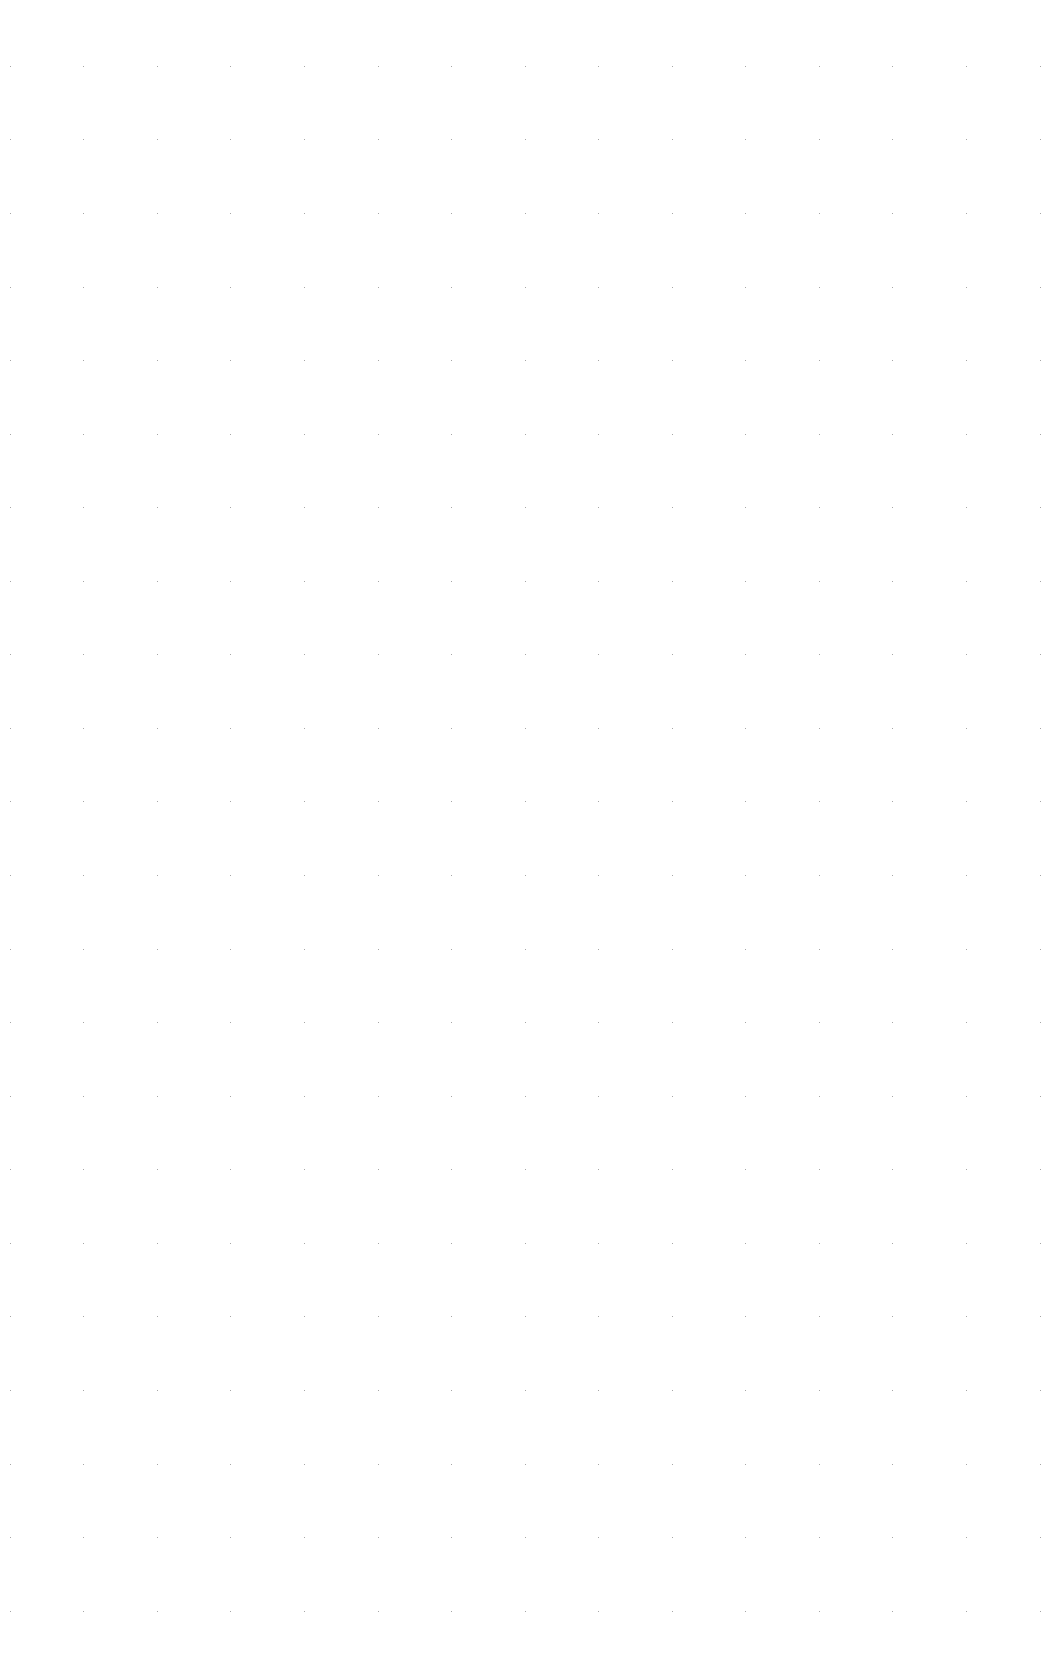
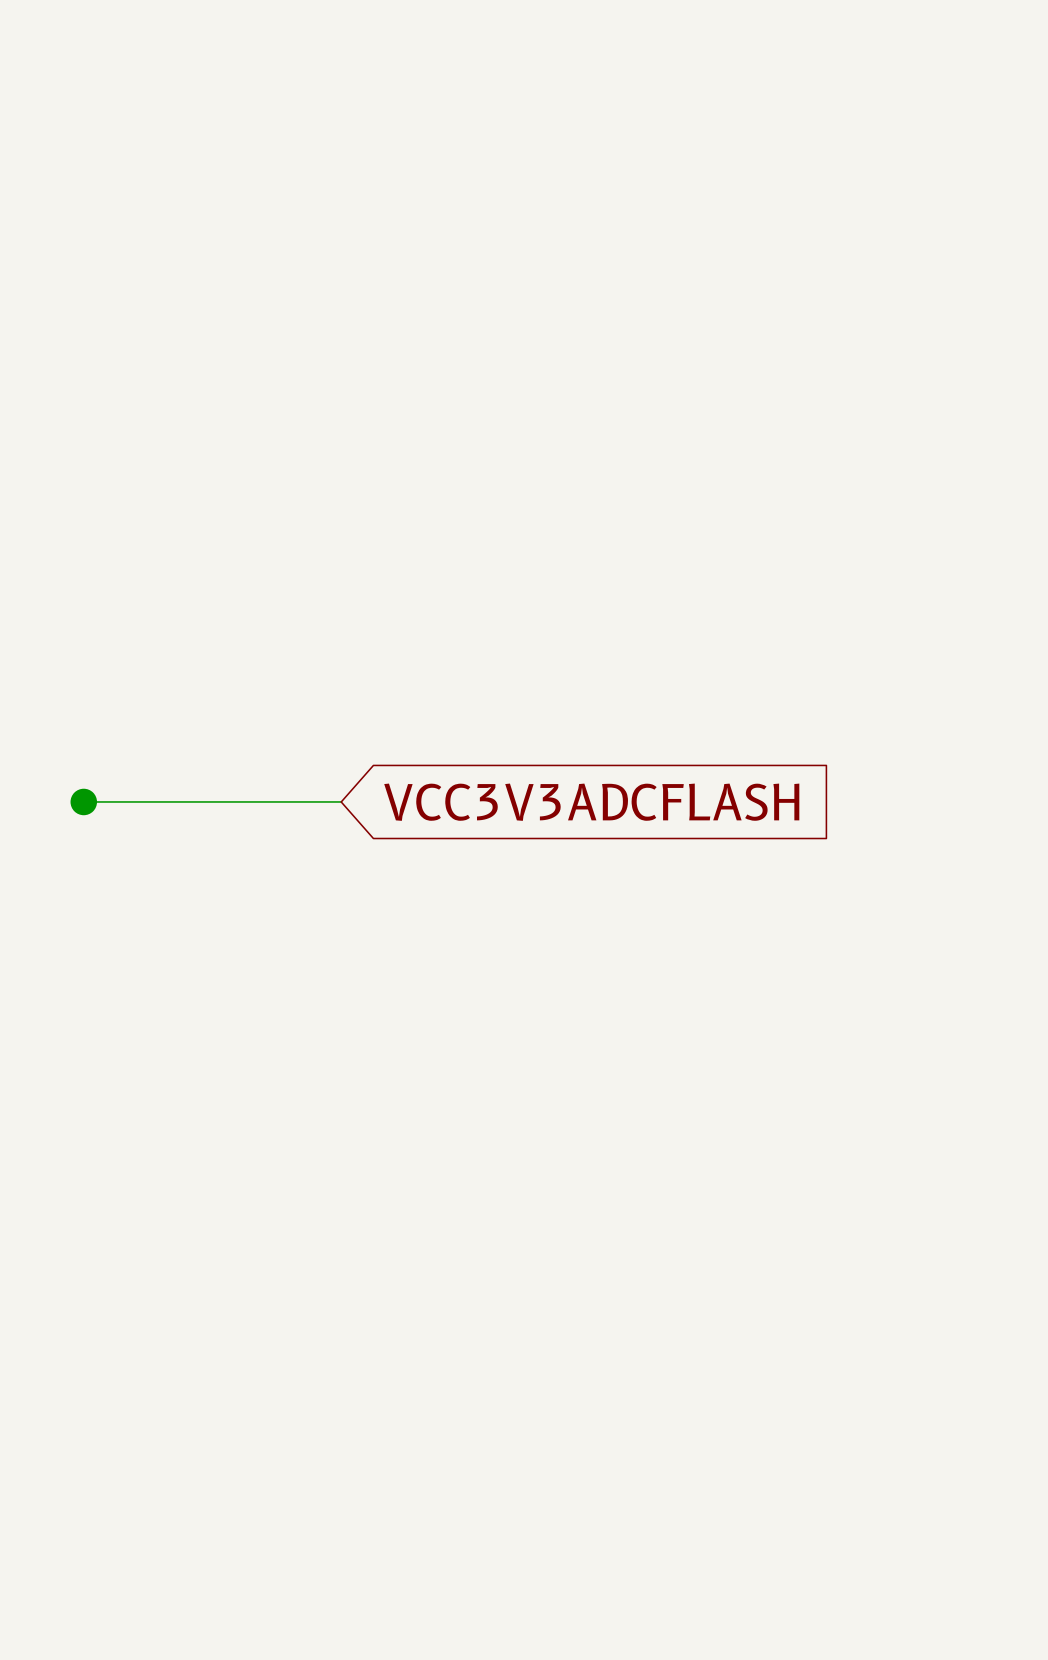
wire: none -> (83, 801) (341, 801)
junction: none -> (83, 801)
global label: none -> VCC3V3ADCFLASH (591, 802)

